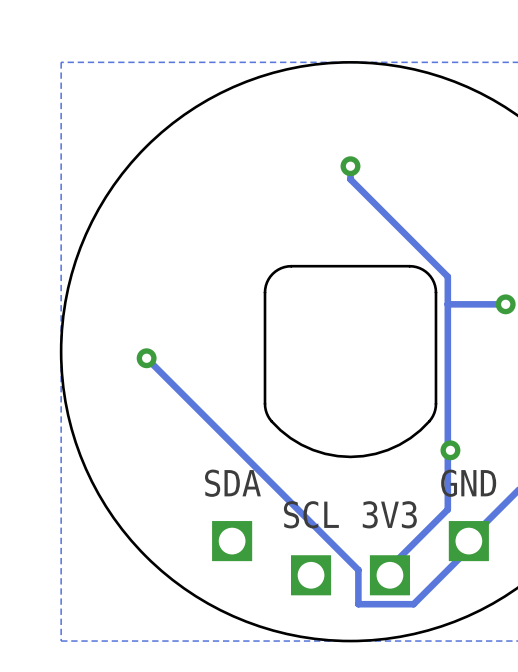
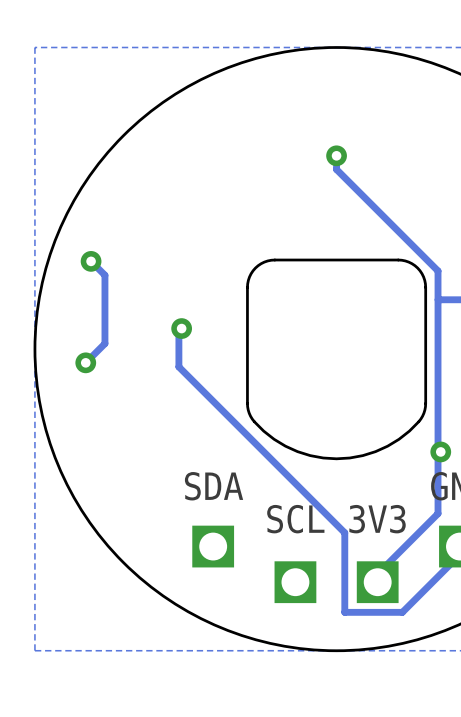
track: none -> (91, 261) (104, 275) (104, 343) (85, 362)
via: none -> (91, 261)
via: none -> (181, 328)
track: (146, 358) (358, 570) -> (181, 328) (178, 331) (178, 366) (344, 532) (344, 576)
via: (146, 358) -> none
via: none -> (85, 362)

